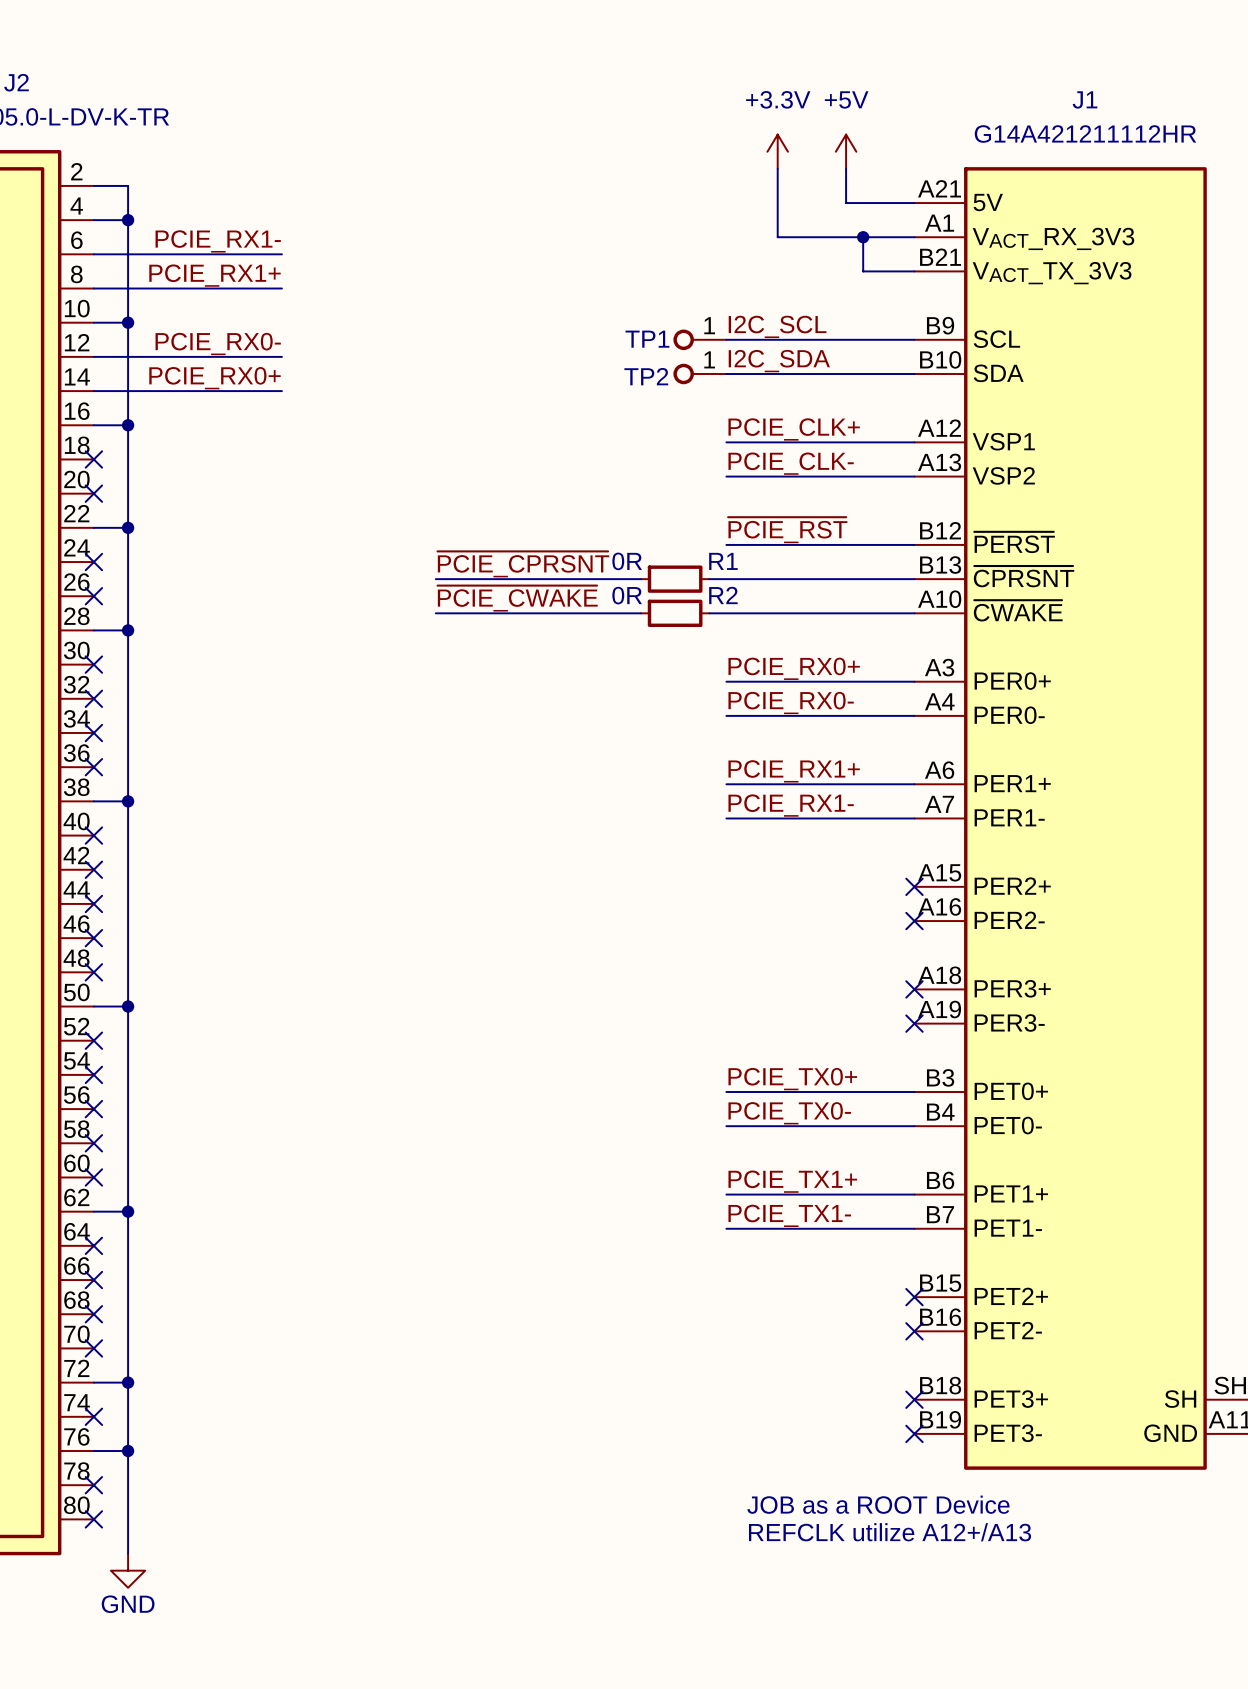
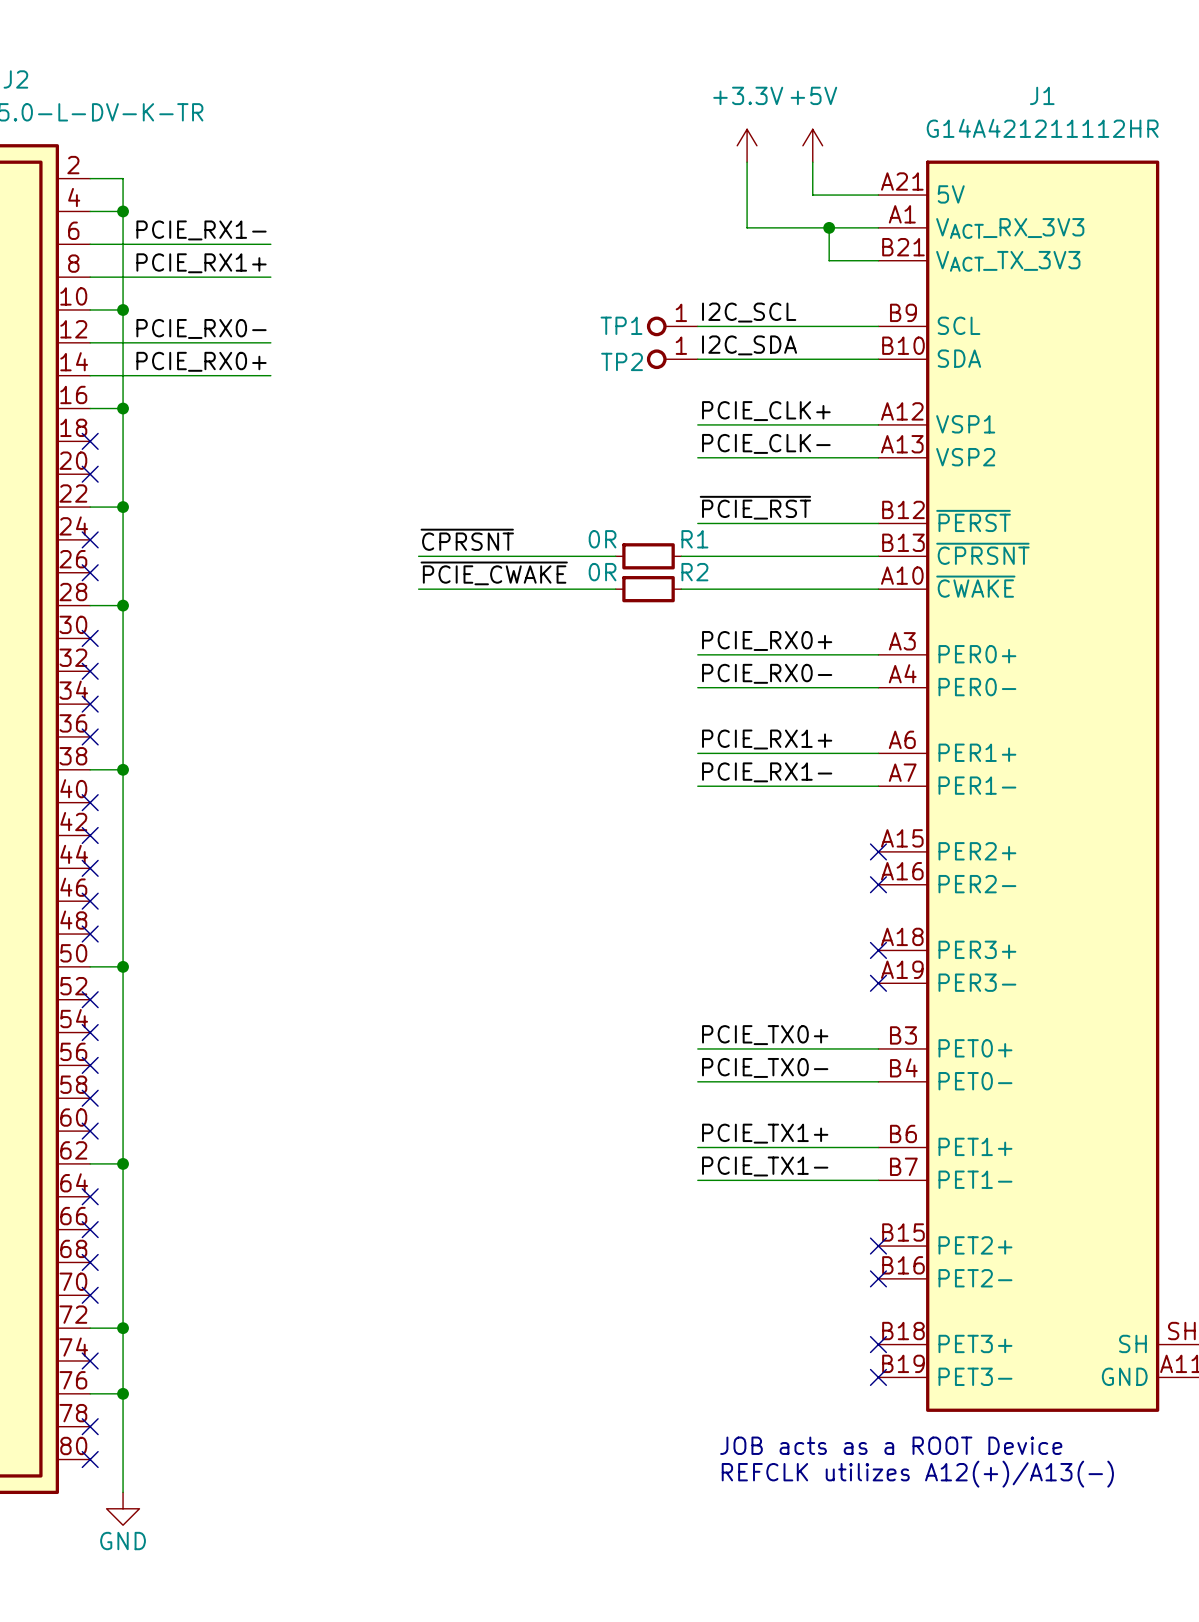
label: ~{PCIE_CPRSNT} (523, 564) -> ~{CPRSNT} (467, 539)
text: JOB as a ROOT Device (878, 1504) -> JOB acts as a ROOT Device (891, 1445)
text: REFCLK utilize A12+/A13 (890, 1532) -> REFCLK utilizes A12(+)/A13(-) (917, 1474)

